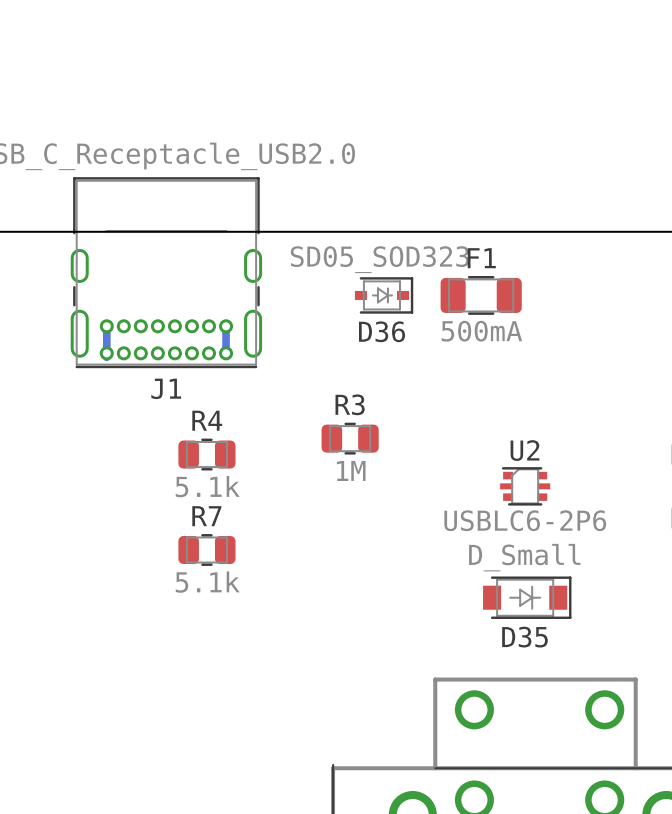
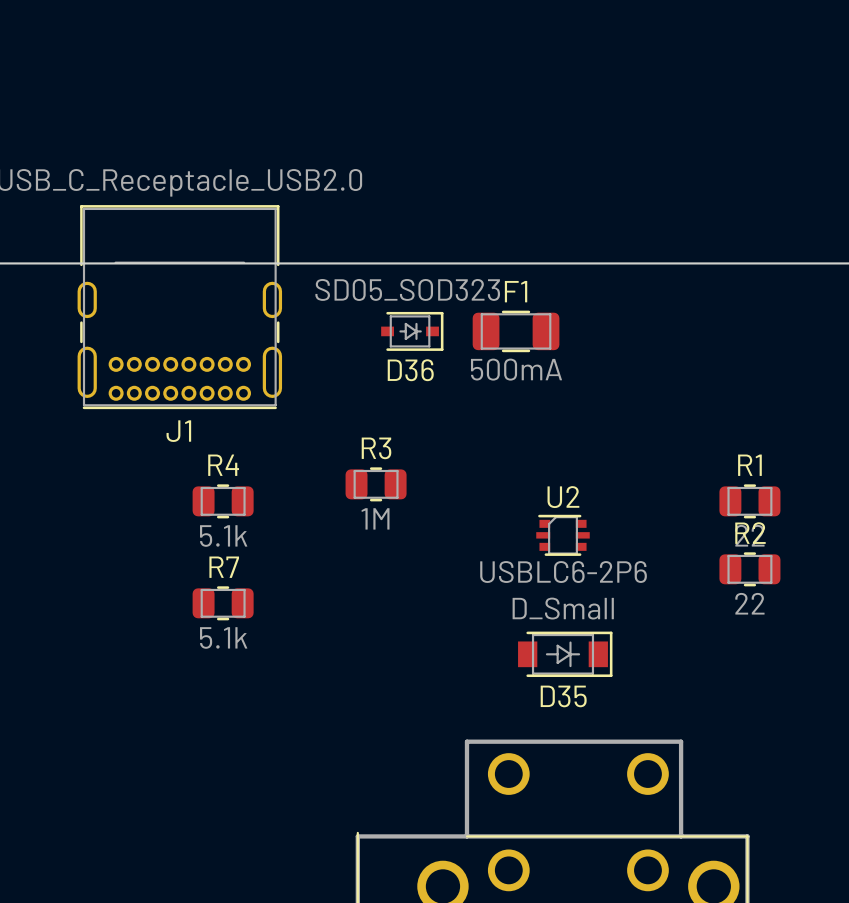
bottom track: (106, 326) (106, 357) -> none
bottom track: (226, 326) (226, 353) -> none

